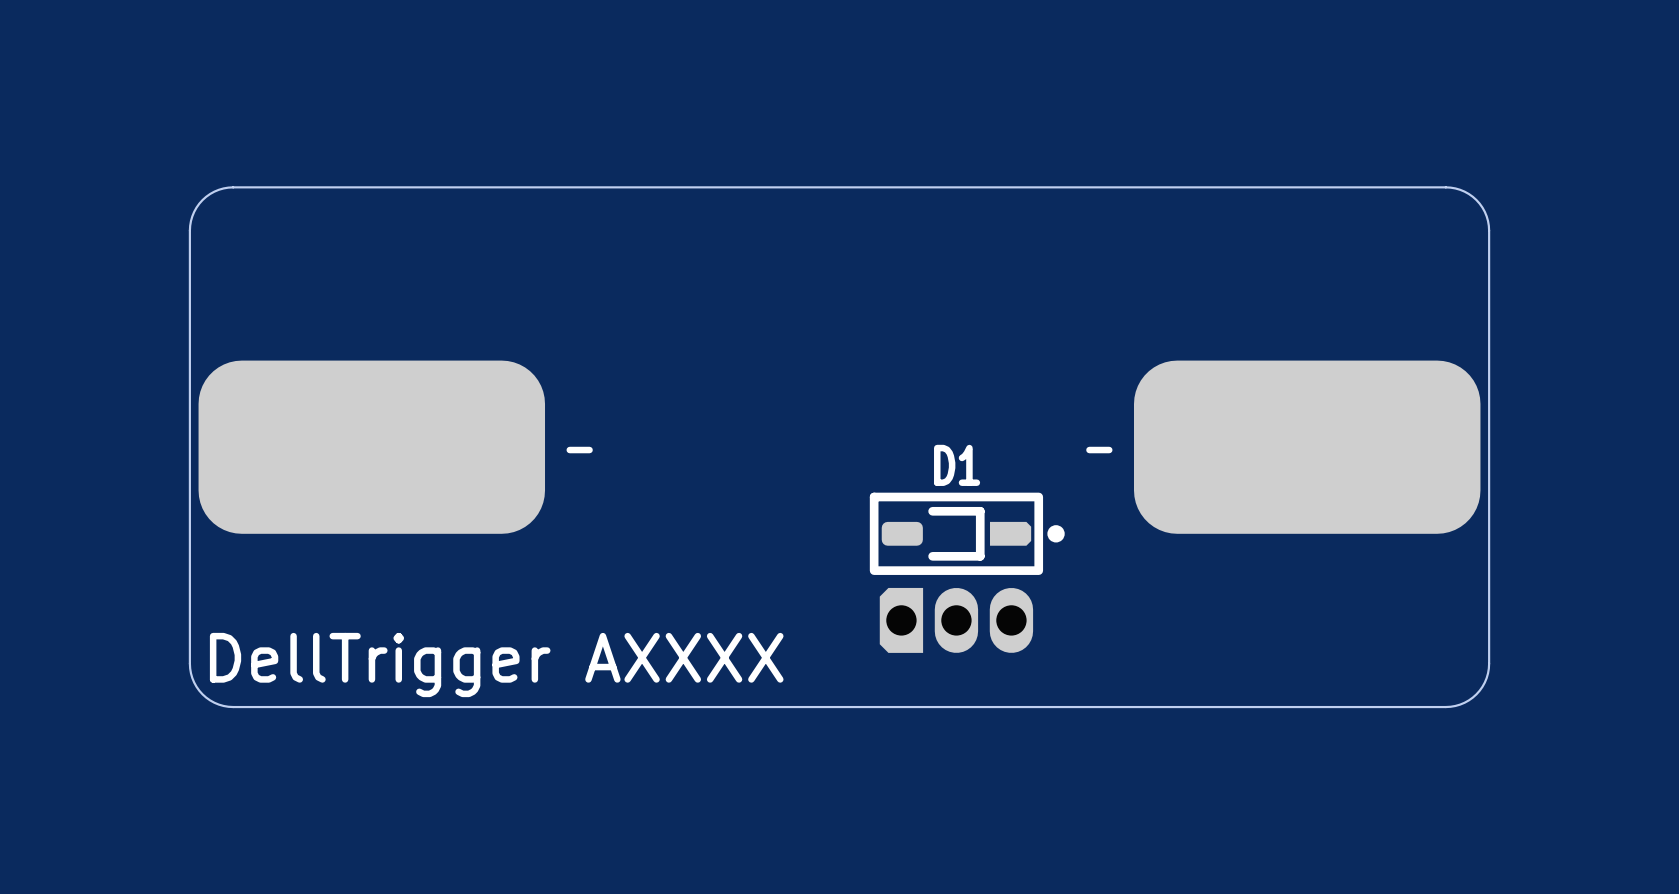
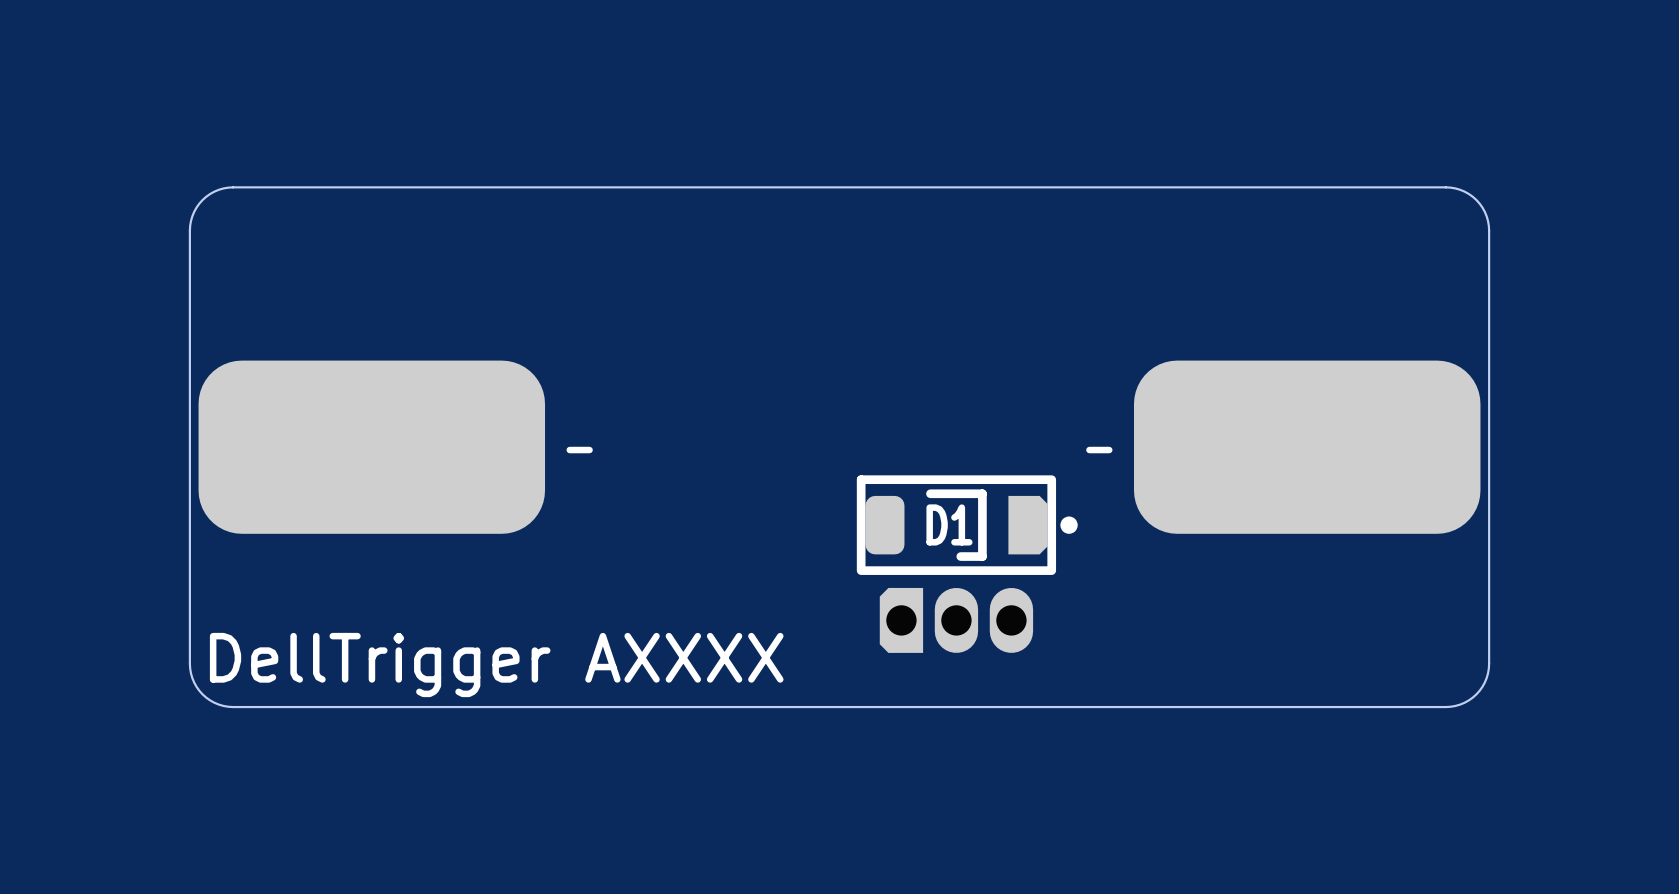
D1 name position: D1 (957, 465) -> D1 (949, 524)
D1 footprint: [869, 492, 1065, 575] -> [856, 475, 1078, 575]

